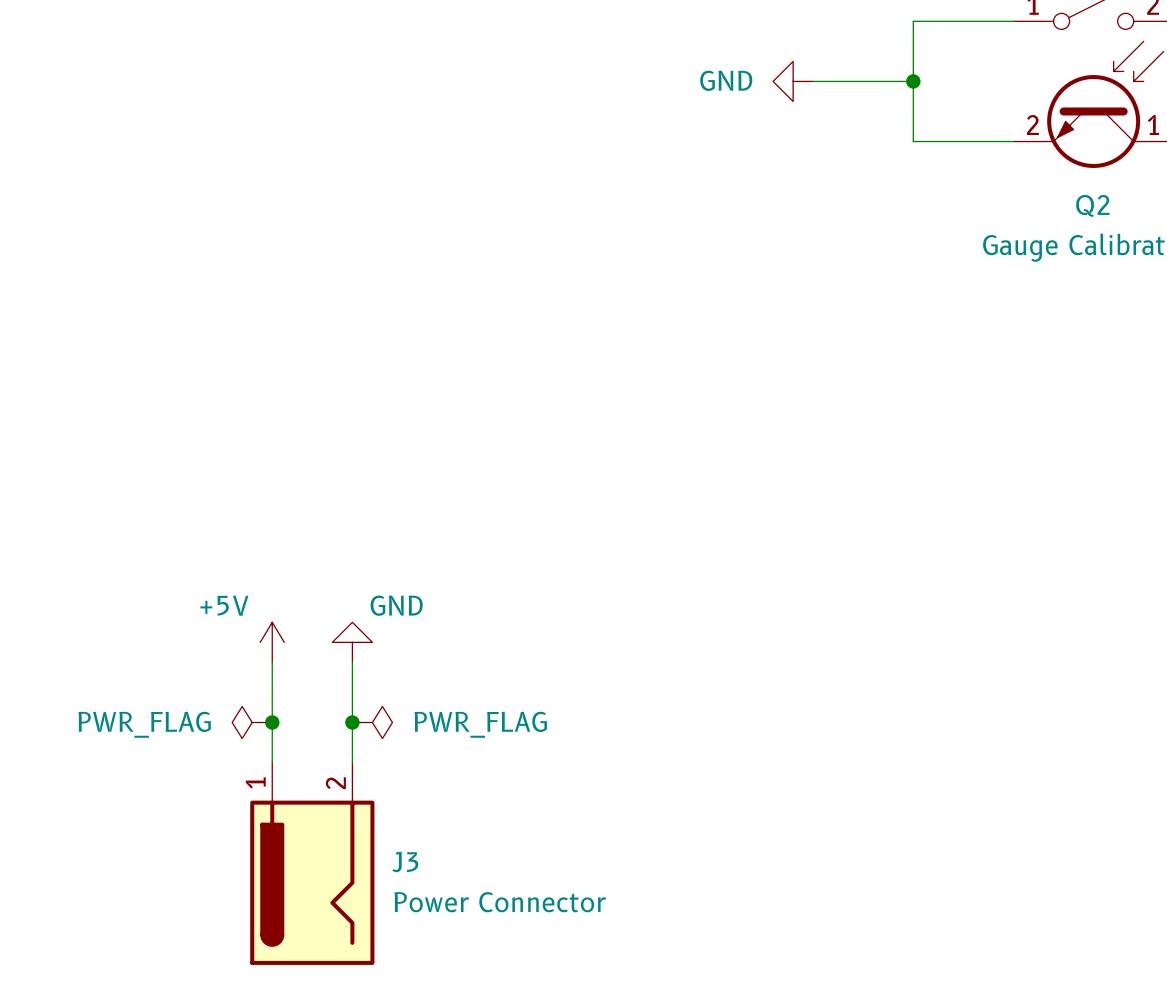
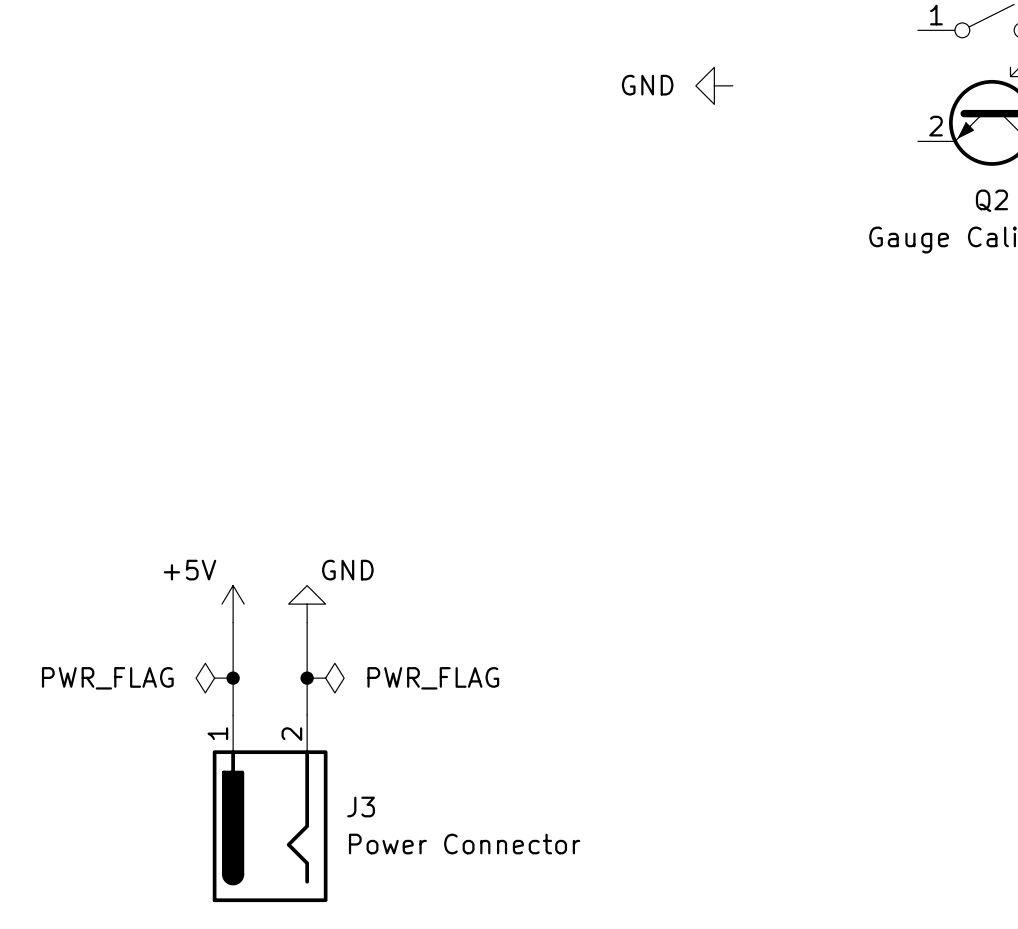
wire: (1013, 21) (913, 21) (913, 141) (1013, 141) -> none
wire: (813, 81) (913, 81) -> none
junction: (913, 81) -> none

